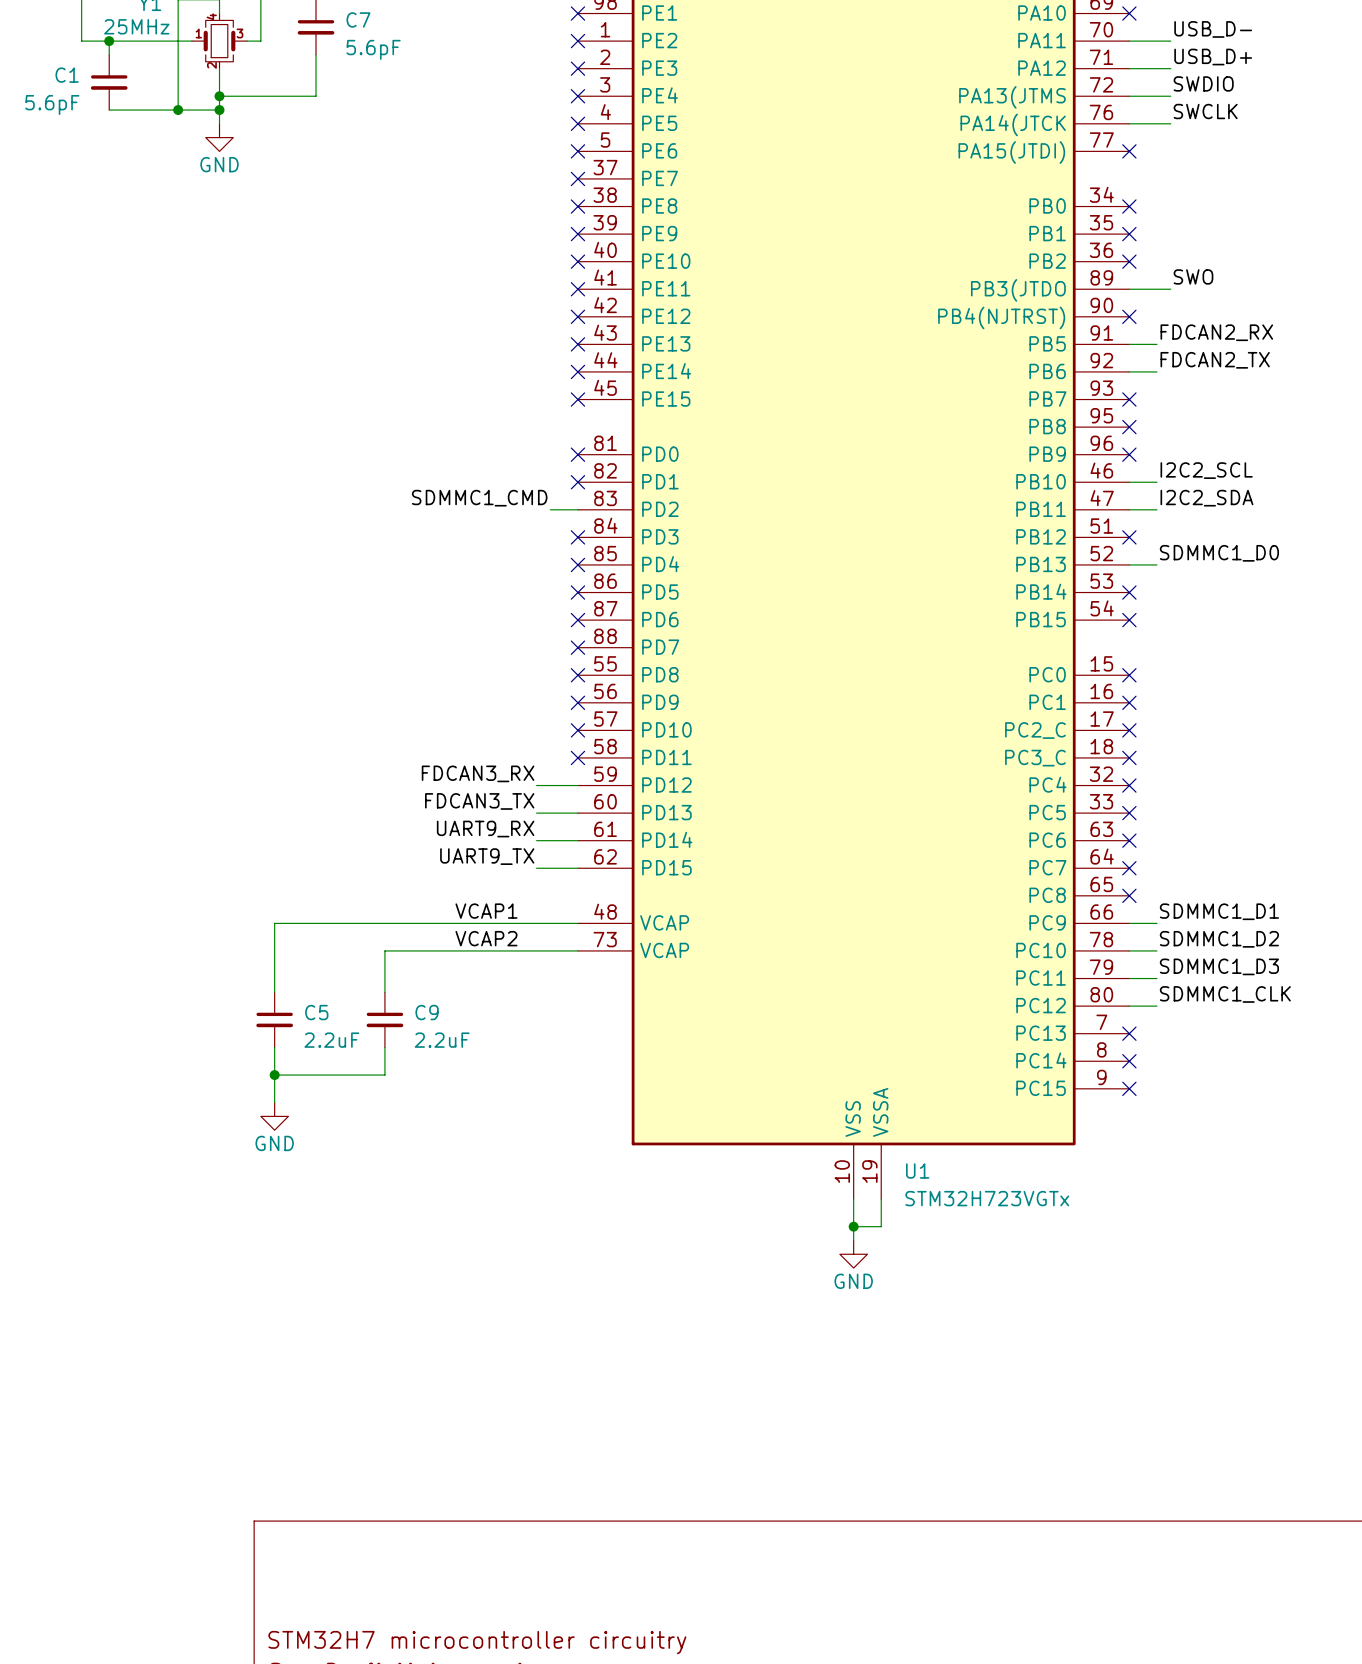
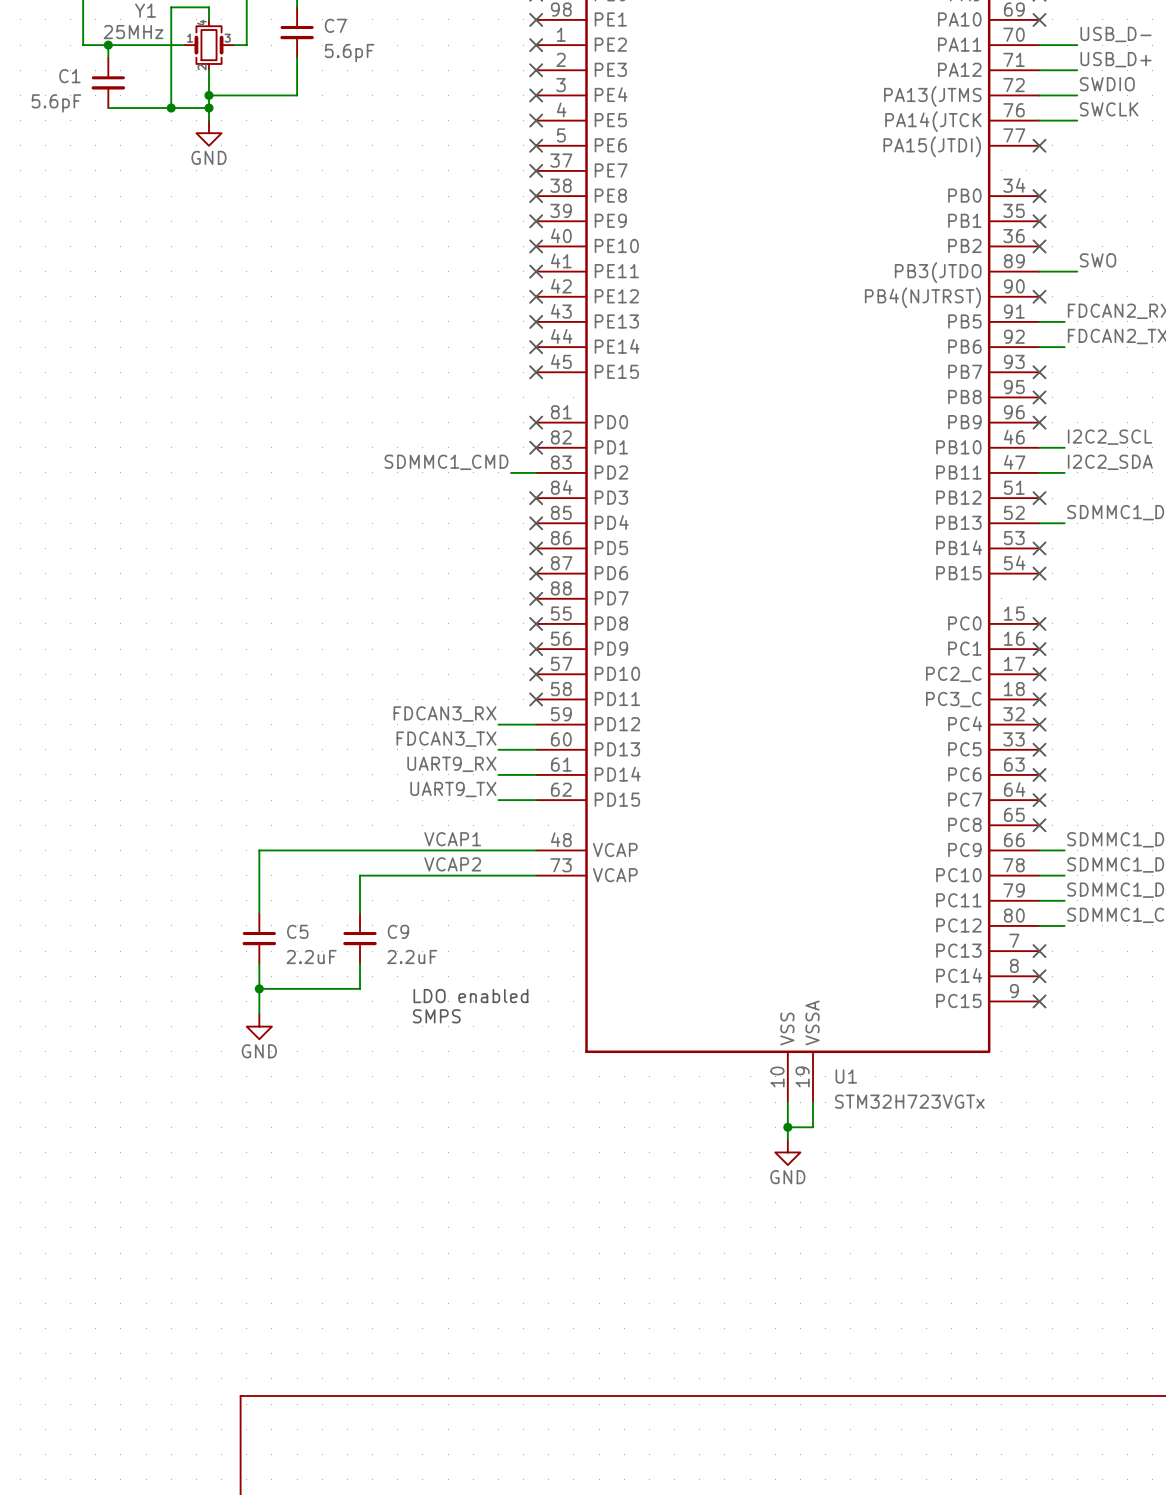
text: none -> LDO enabled (470, 996)
text: none -> SMPS (436, 1016)

